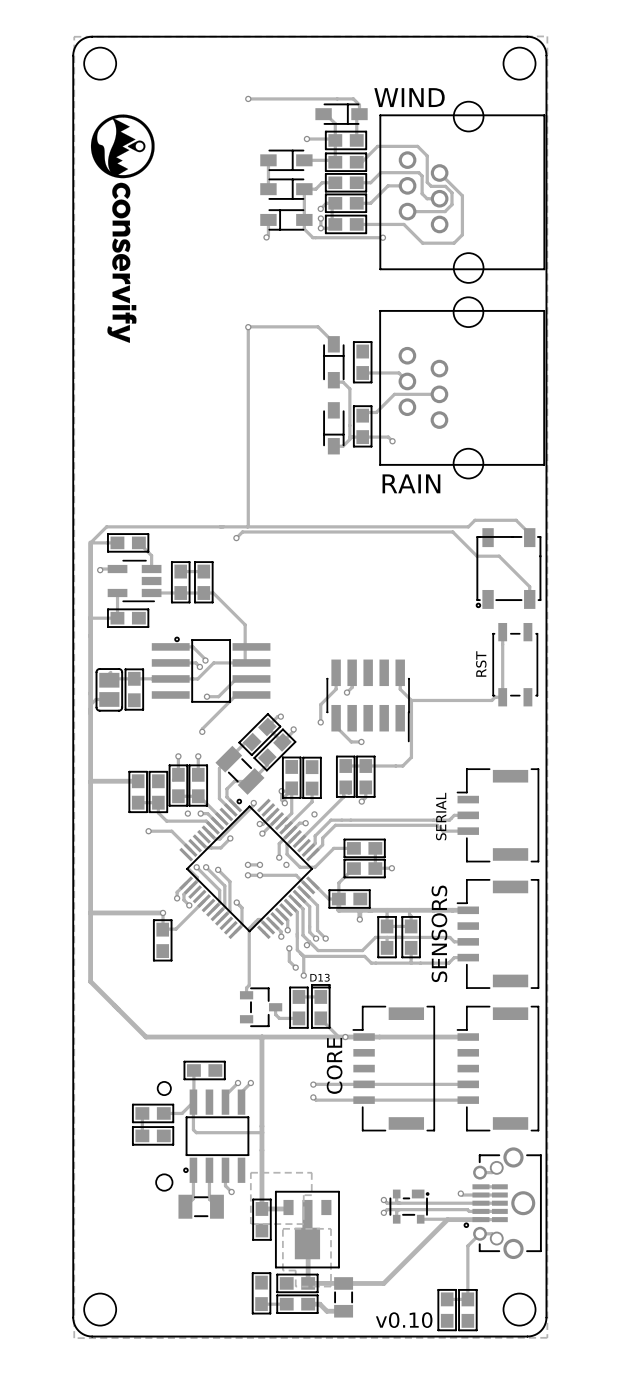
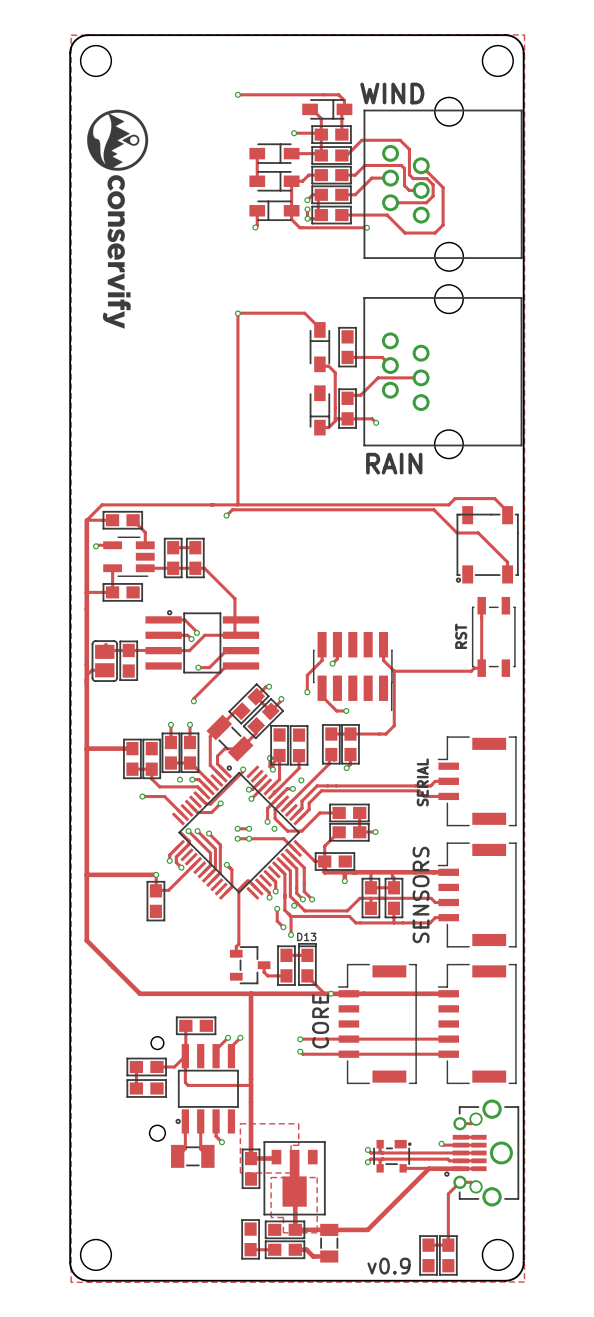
text: v0.10 (404, 1320) -> v0.9 (389, 1266)

